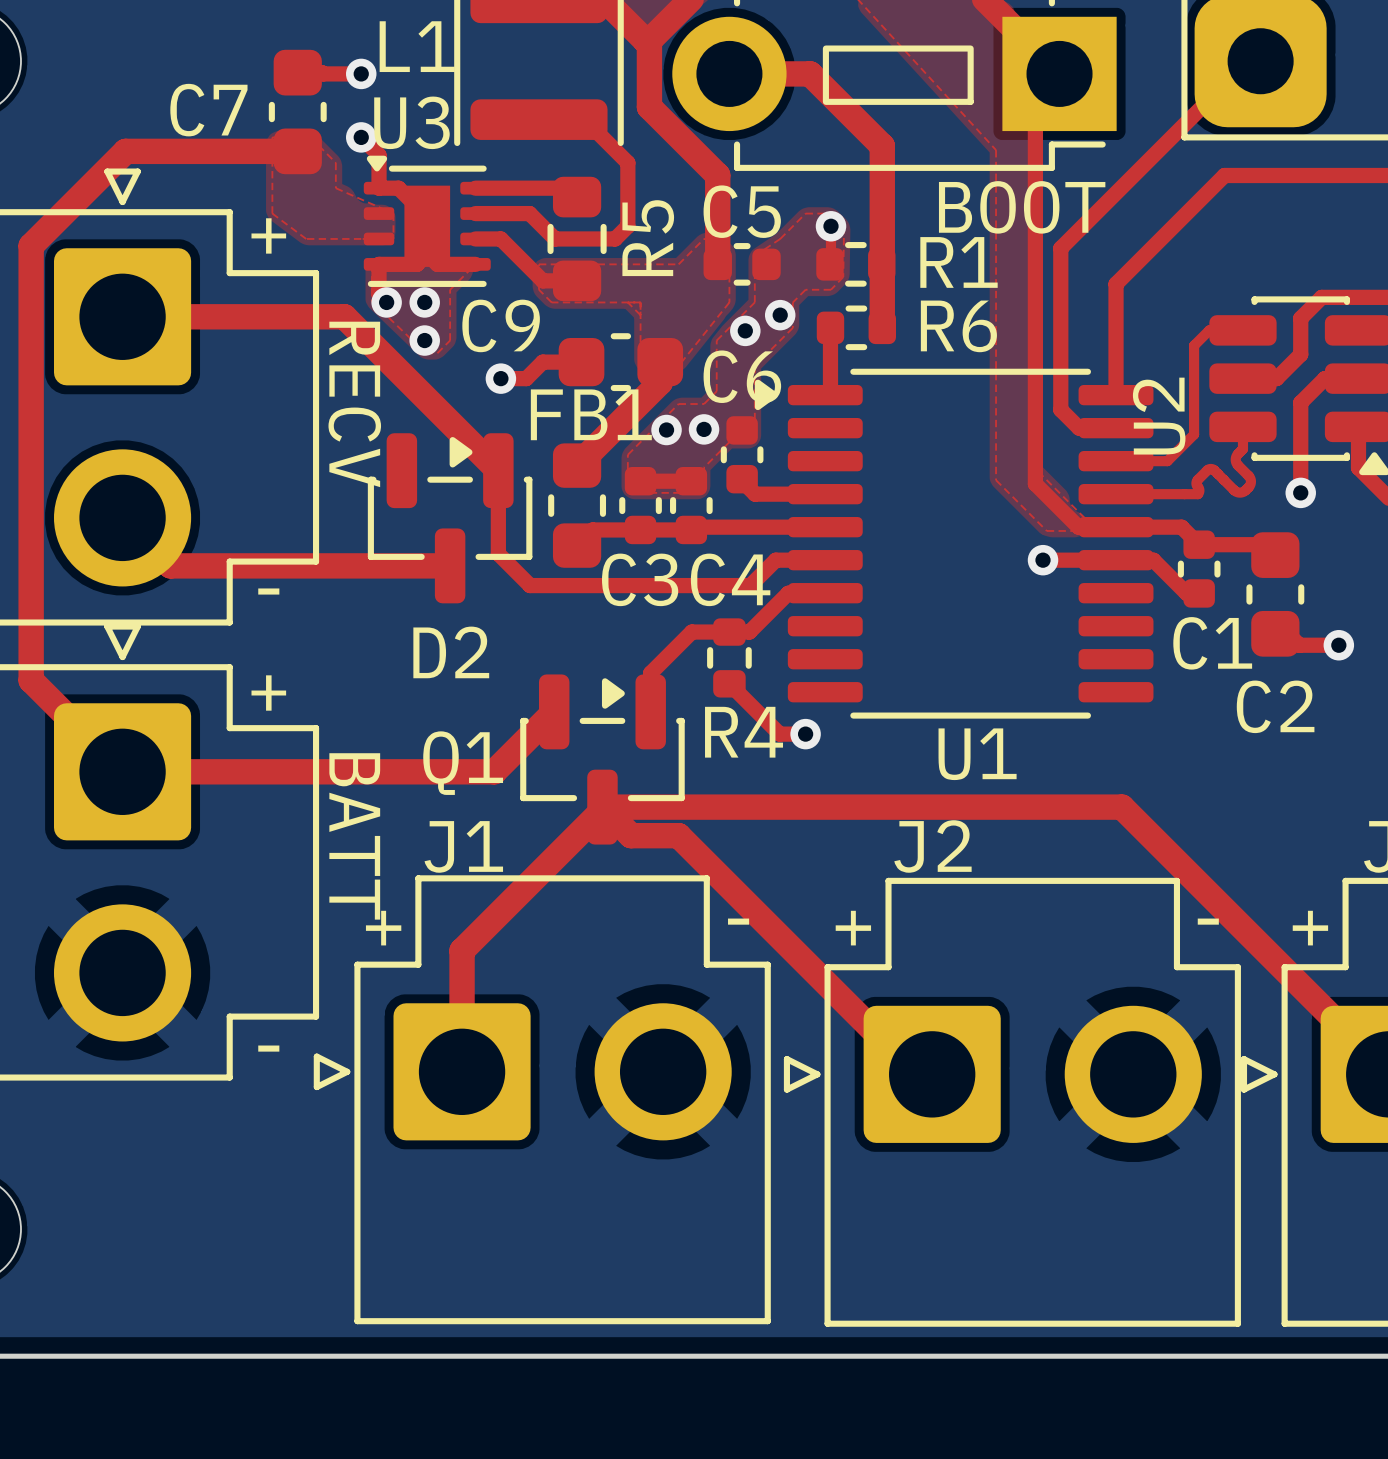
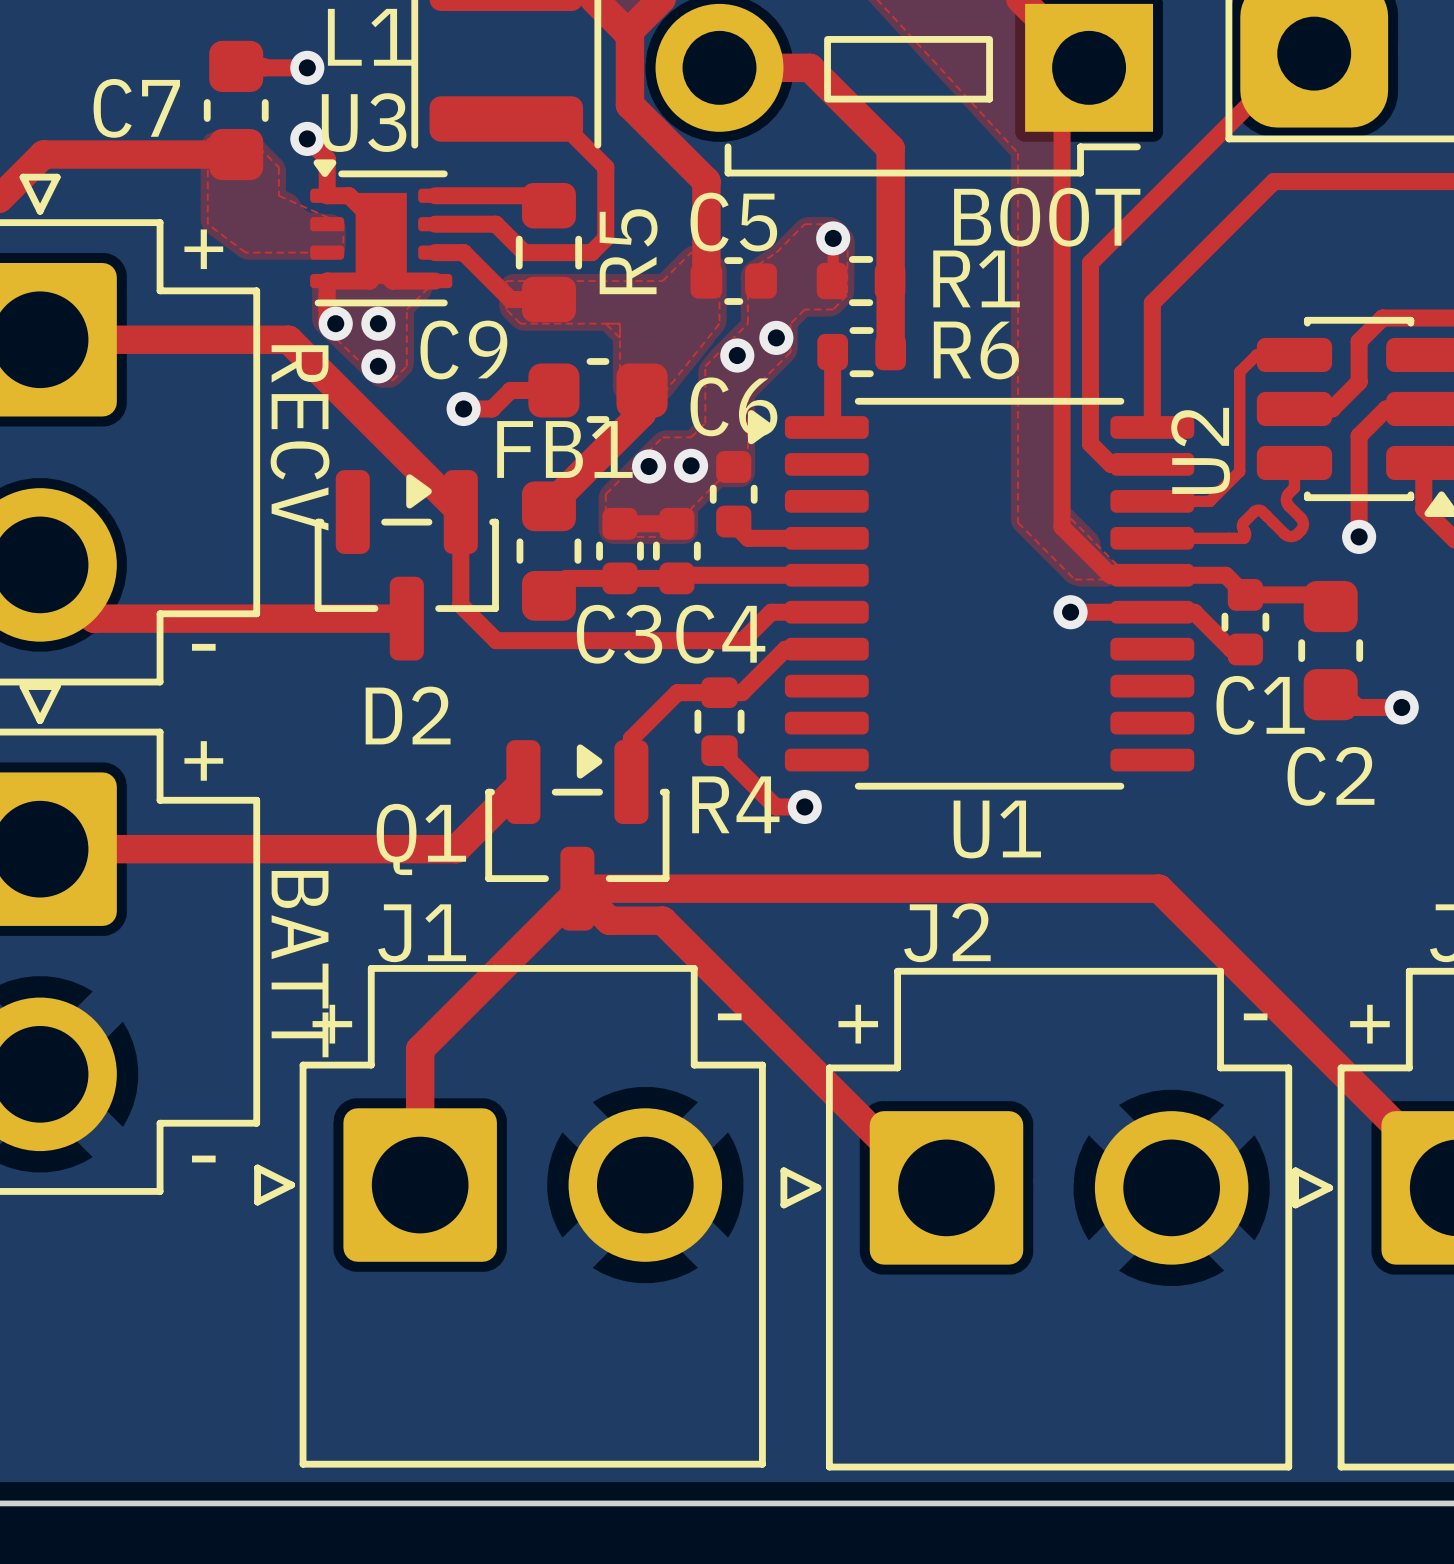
text position: BATT (354, 836) -> BATT (300, 964)

